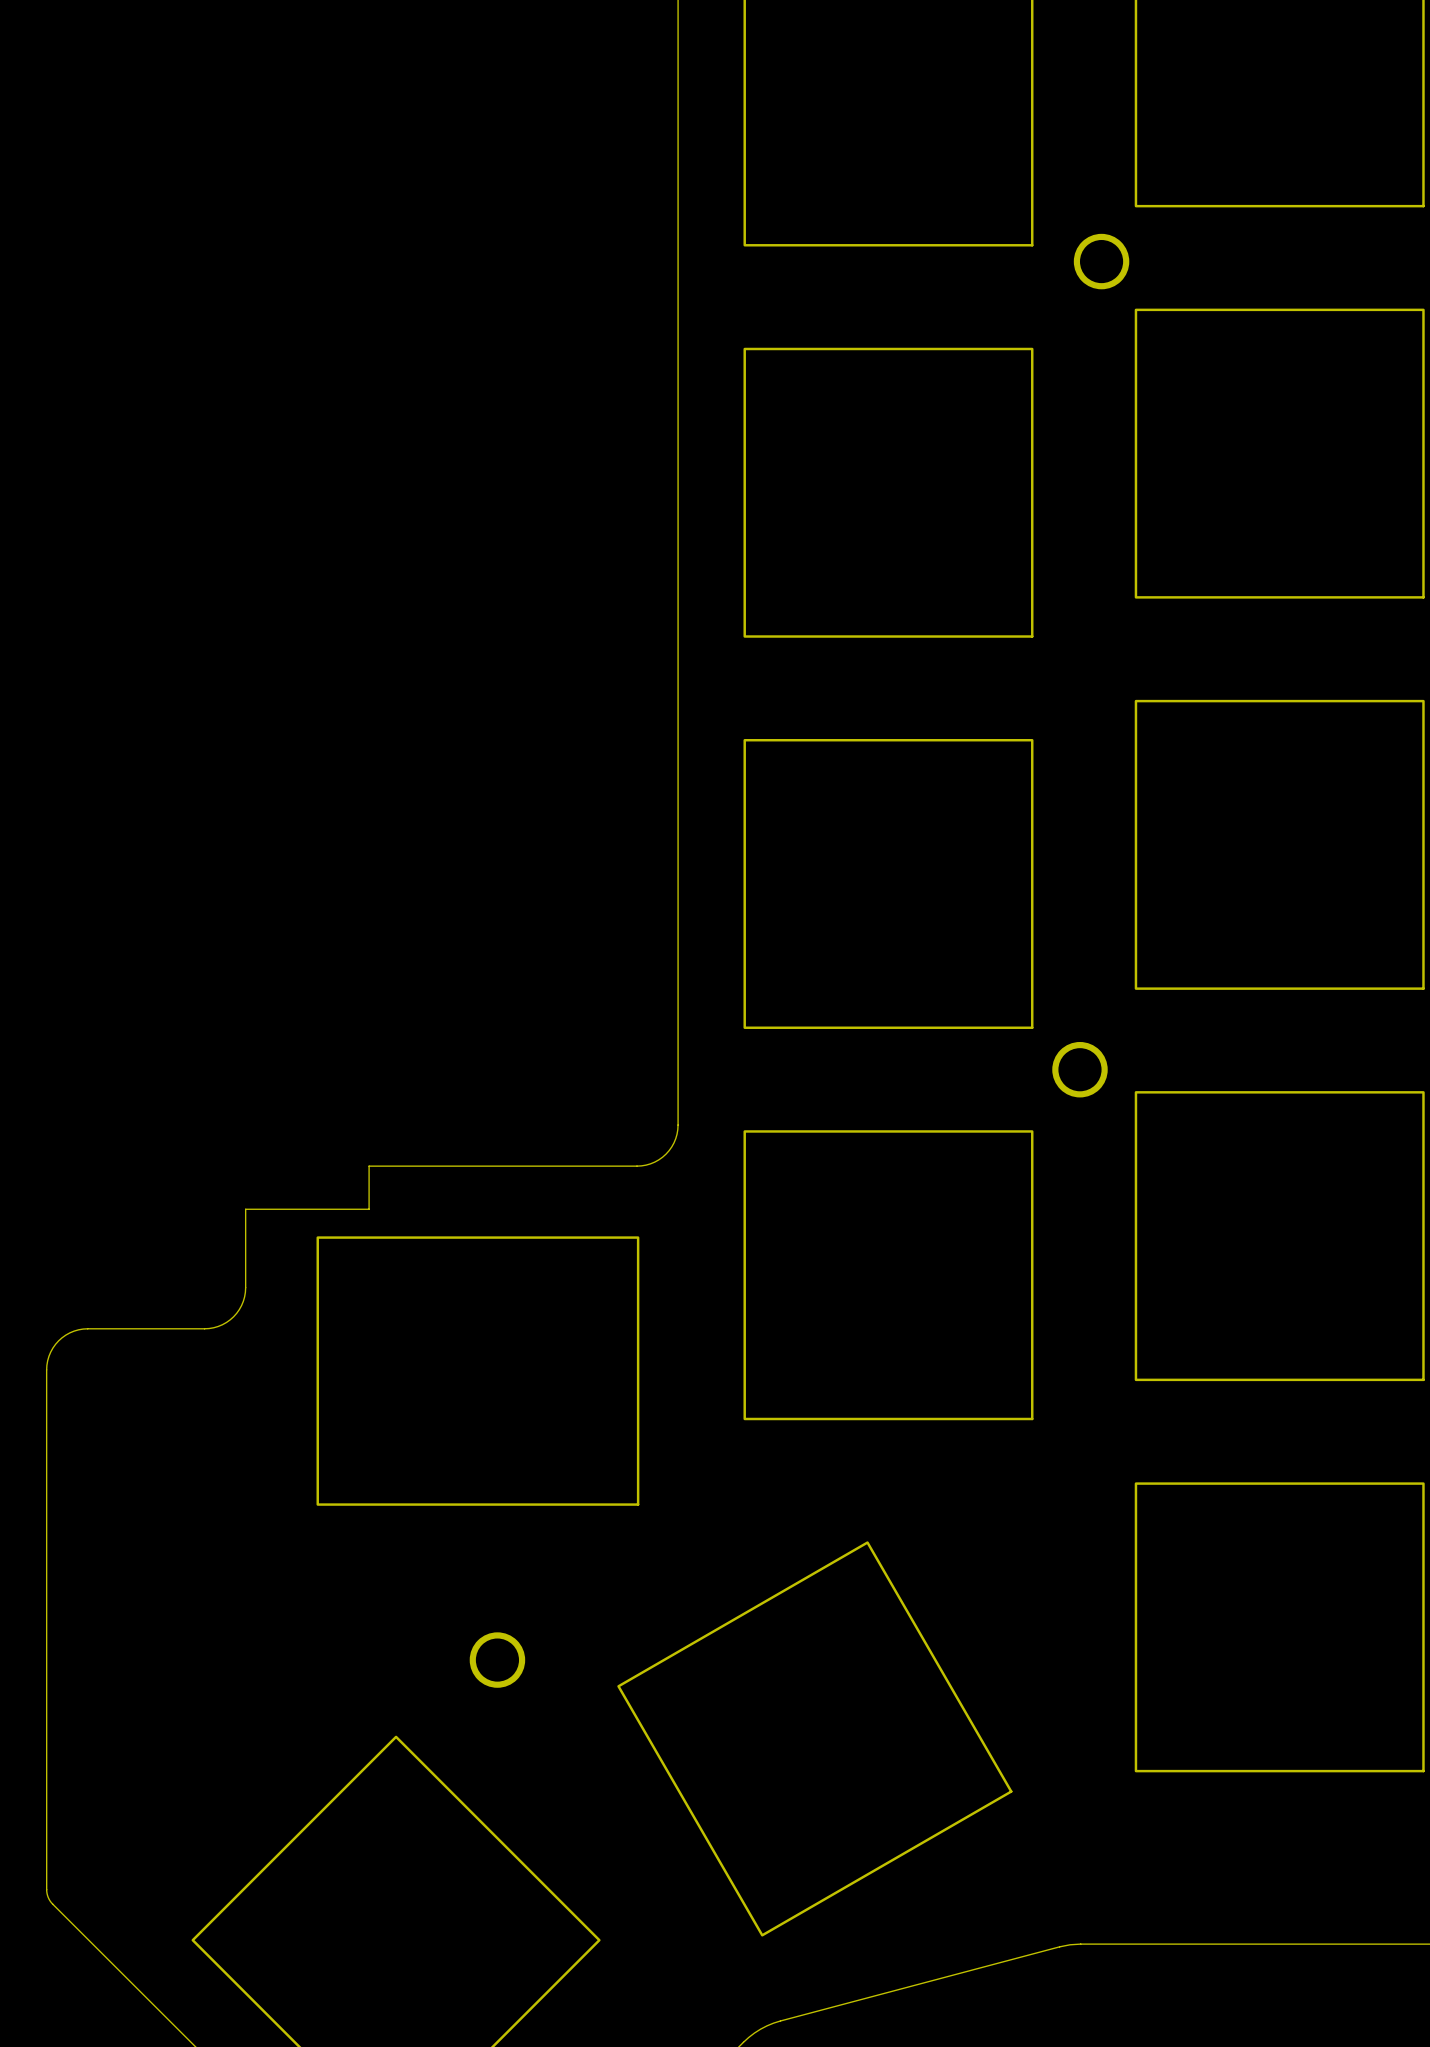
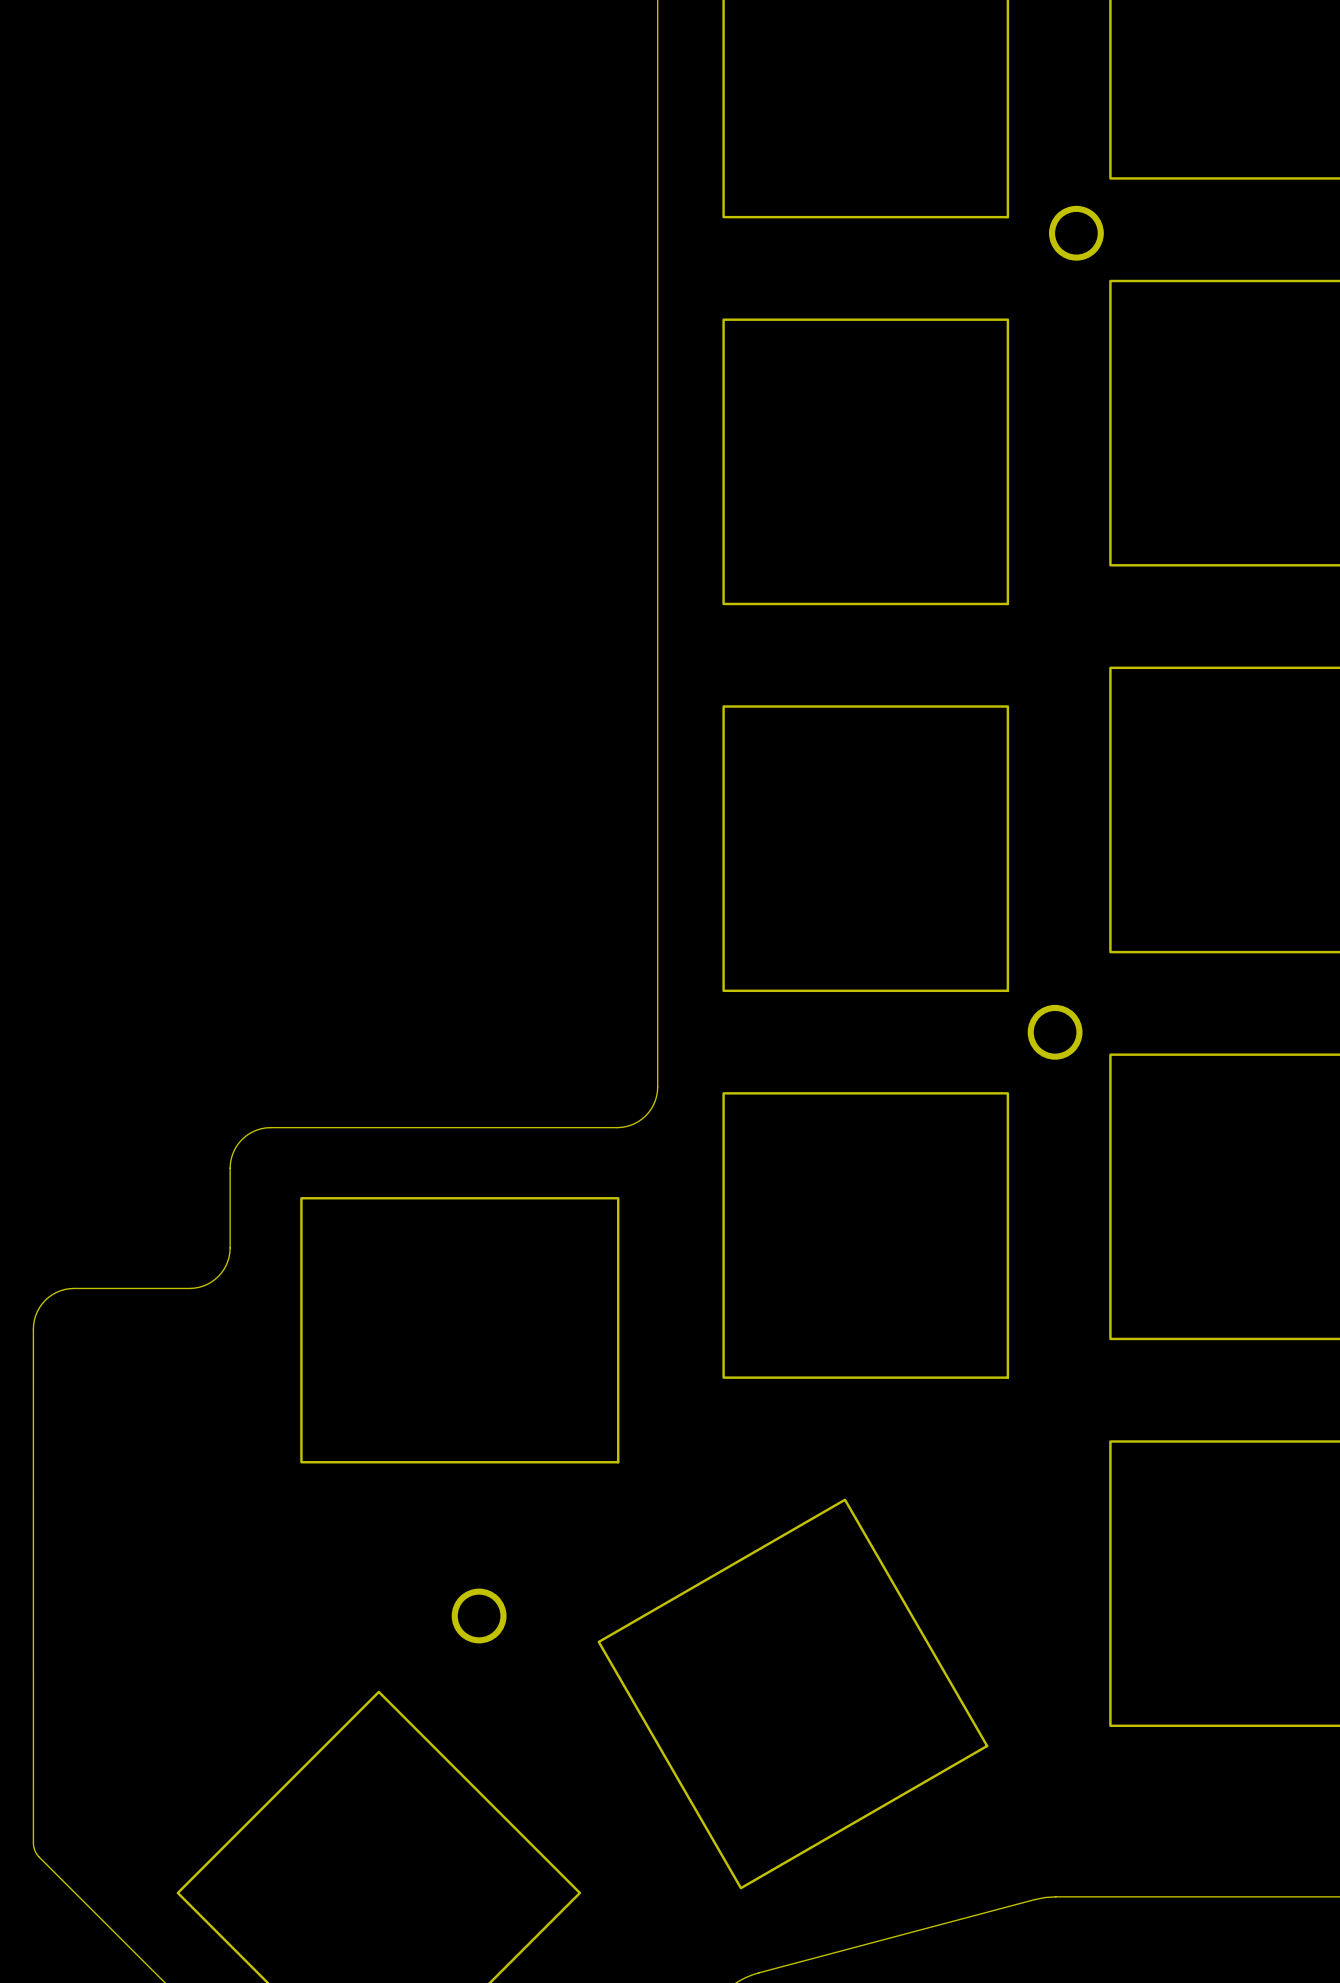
board edge: (369, 1166) (369, 1209) (245, 1209) -> (352, 1127) (270, 1127) (257, 1129) (245, 1136) (236, 1146) (231, 1159) (230, 1170)

